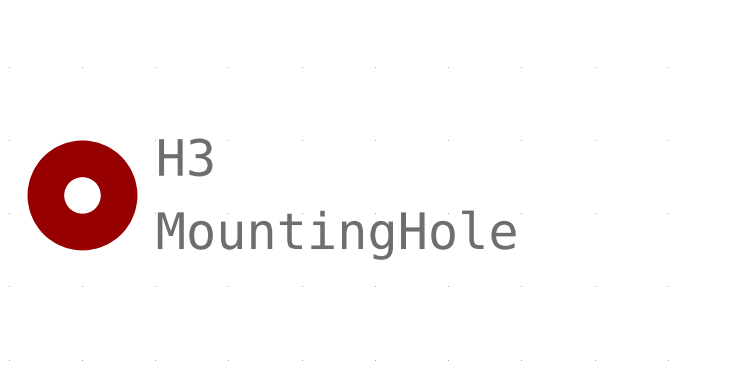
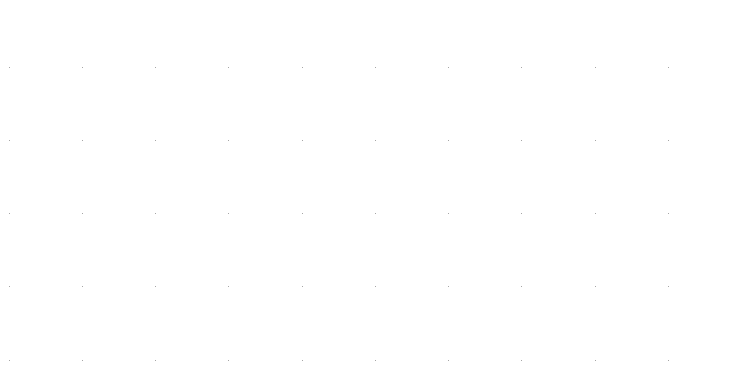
H3: MountingHole (82, 195) -> none

